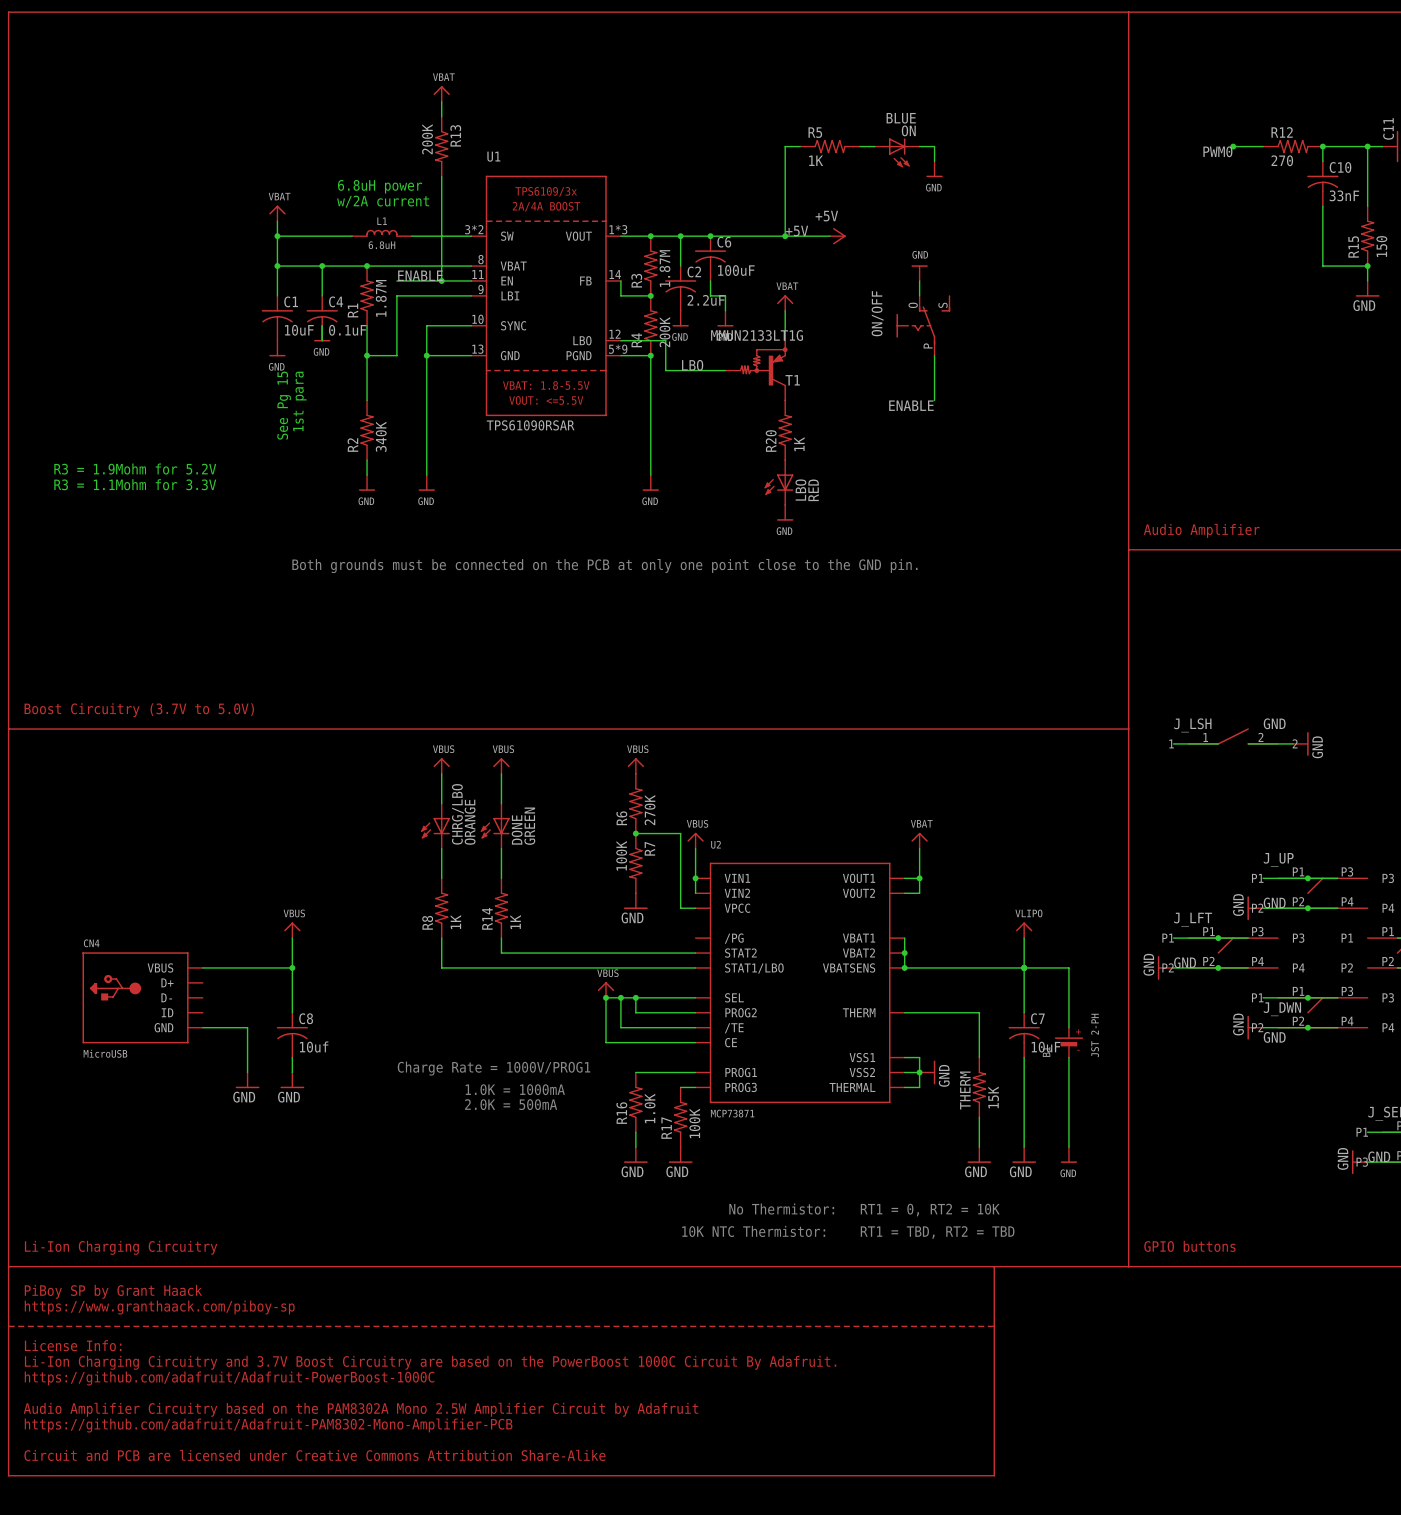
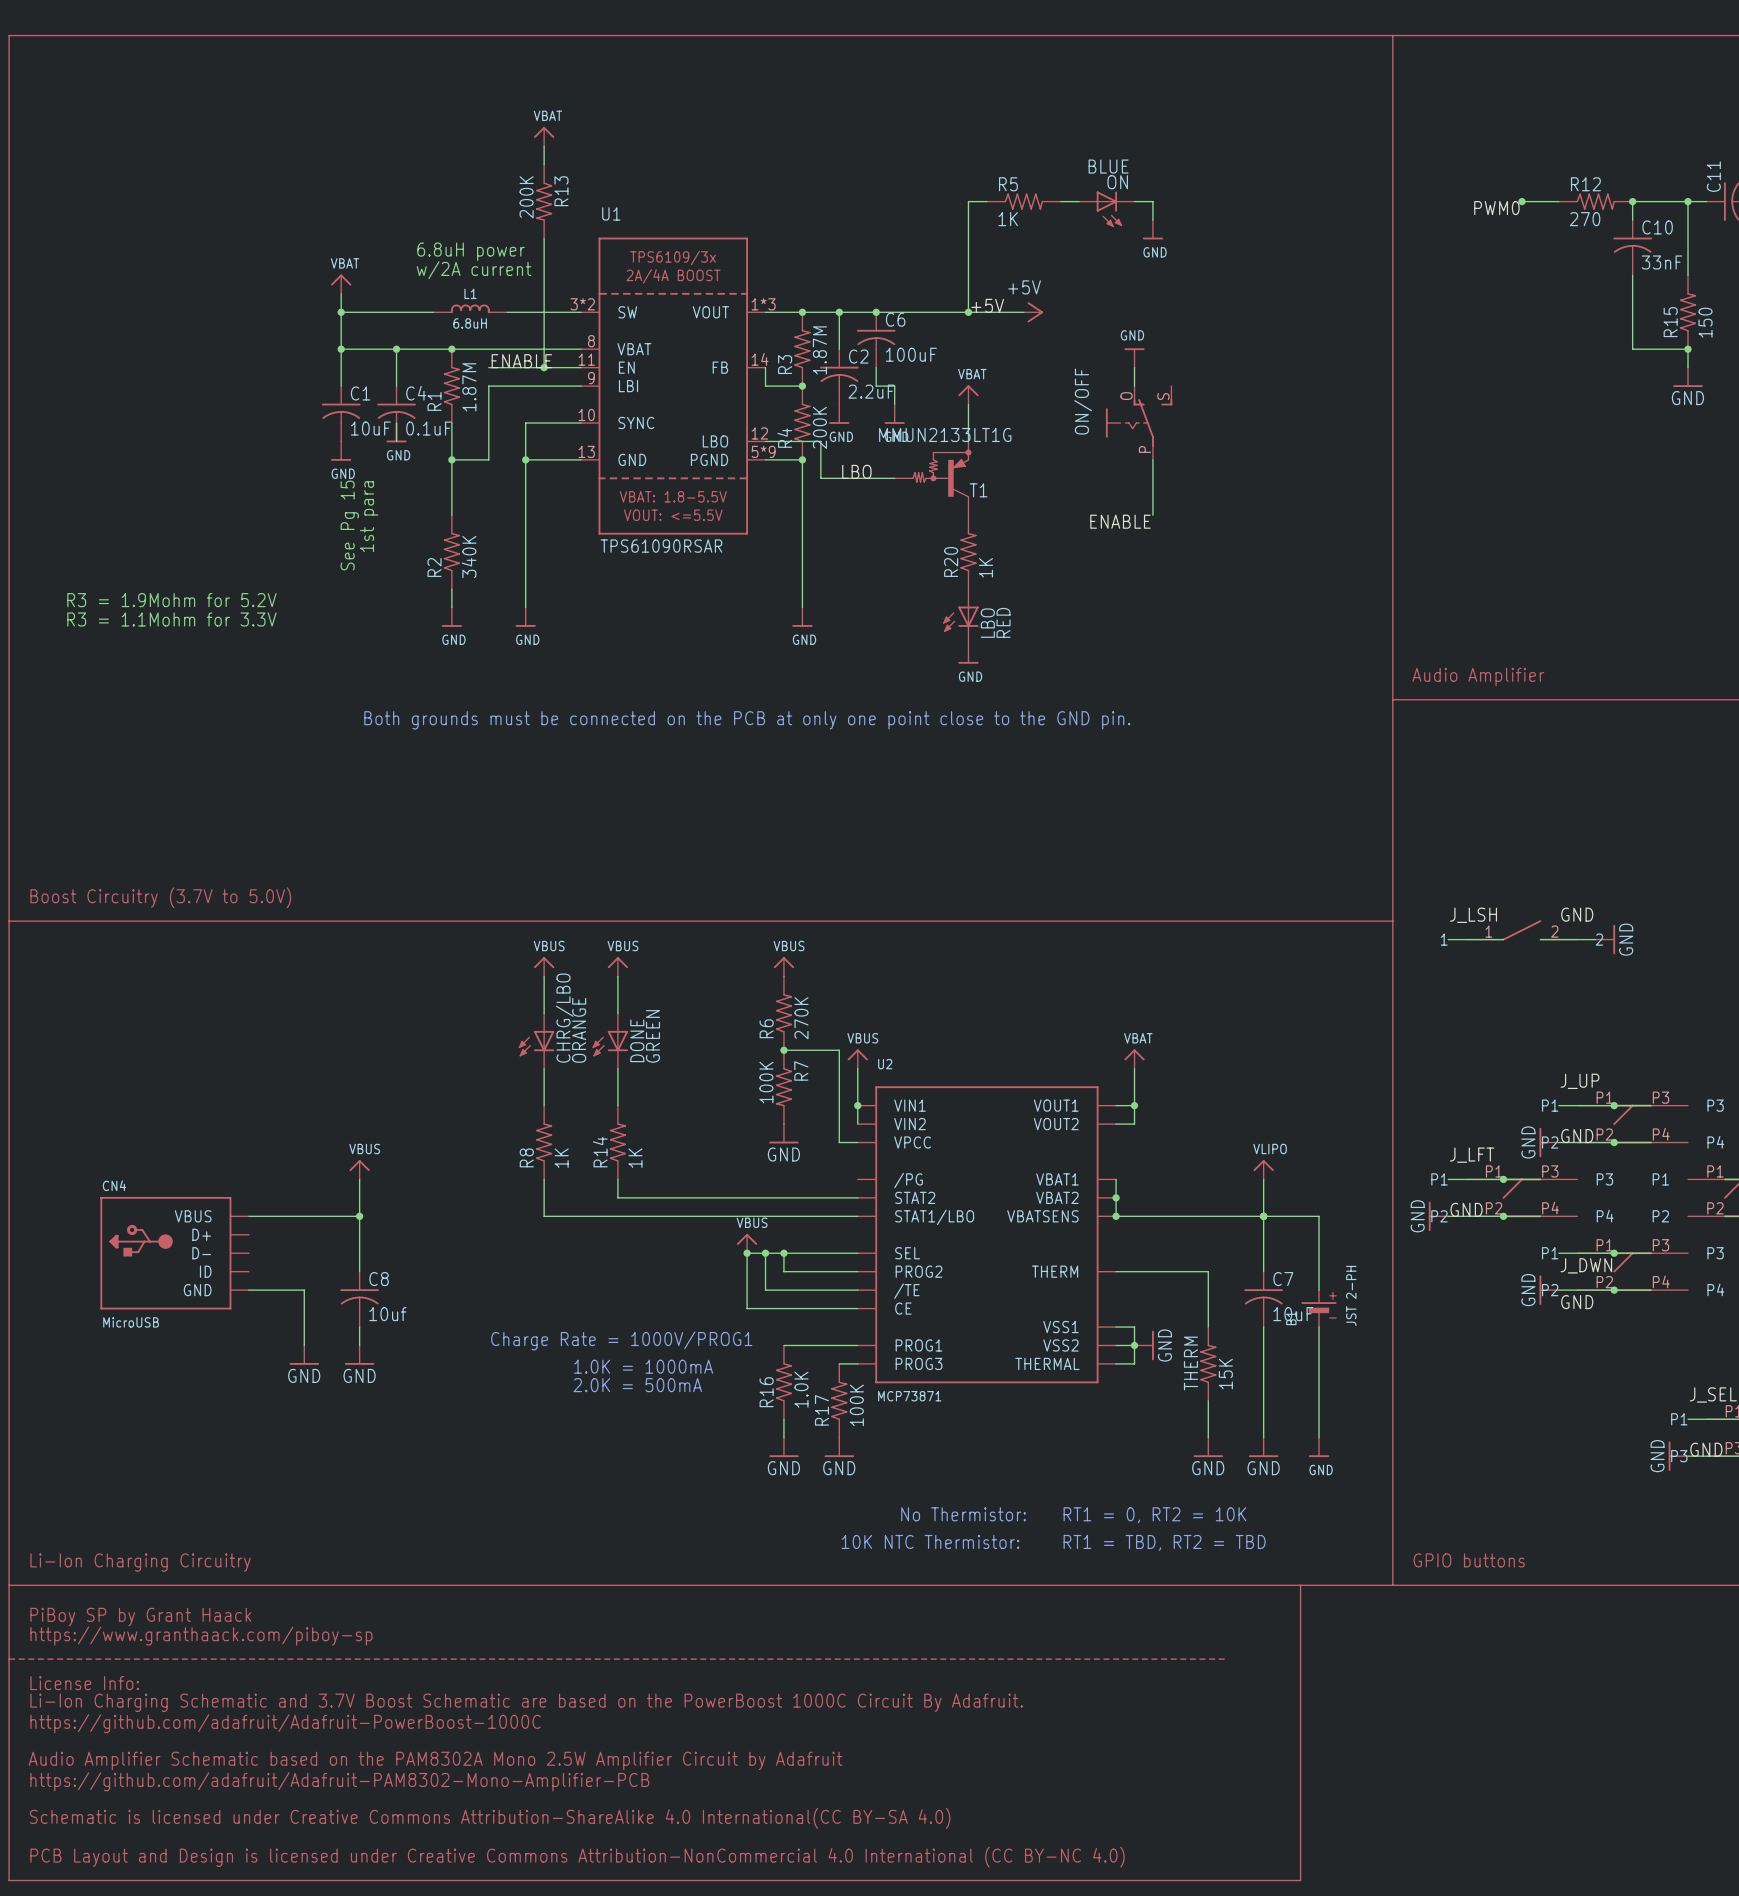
line: (994, 1266) (994, 1475) (8, 1475) -> (1300, 1585) (1300, 1880) (9, 1880) (9, 1843)
text: Li-Ion Charging Circuitry and 3.7V Boost Circuitry are based on the PowerBoost 1000C Circuit By Adafruit. (430, 1362) -> Li-Ion Charging Schematic and 3.7V Boost Schematic are based on the PowerBoost 1000C Circuit By Adafruit. (526, 1702)
text: Audio Amplifier Circuitry based on the PAM8302A Mono 2.5W Amplifier Circuit by Adafruit (361, 1409) -> Audio Amplifier Schematic based on the PAM8302A Mono 2.5W Amplifier Circuit by Adafruit (435, 1760)
text: Circuit and PCB are licensed under Creative Commons Attribution Share-Alike (314, 1455) -> Schematic is licensed under Creative Commons Attribution-ShareAlike 4.0 International(CC BY-SA 4.0) (490, 1818)
text: none -> PCB Layout and Design is licensed under Creative Commons Attribution-NonCommercial 4.0 International (CC BY-NC 4.0) (577, 1857)

